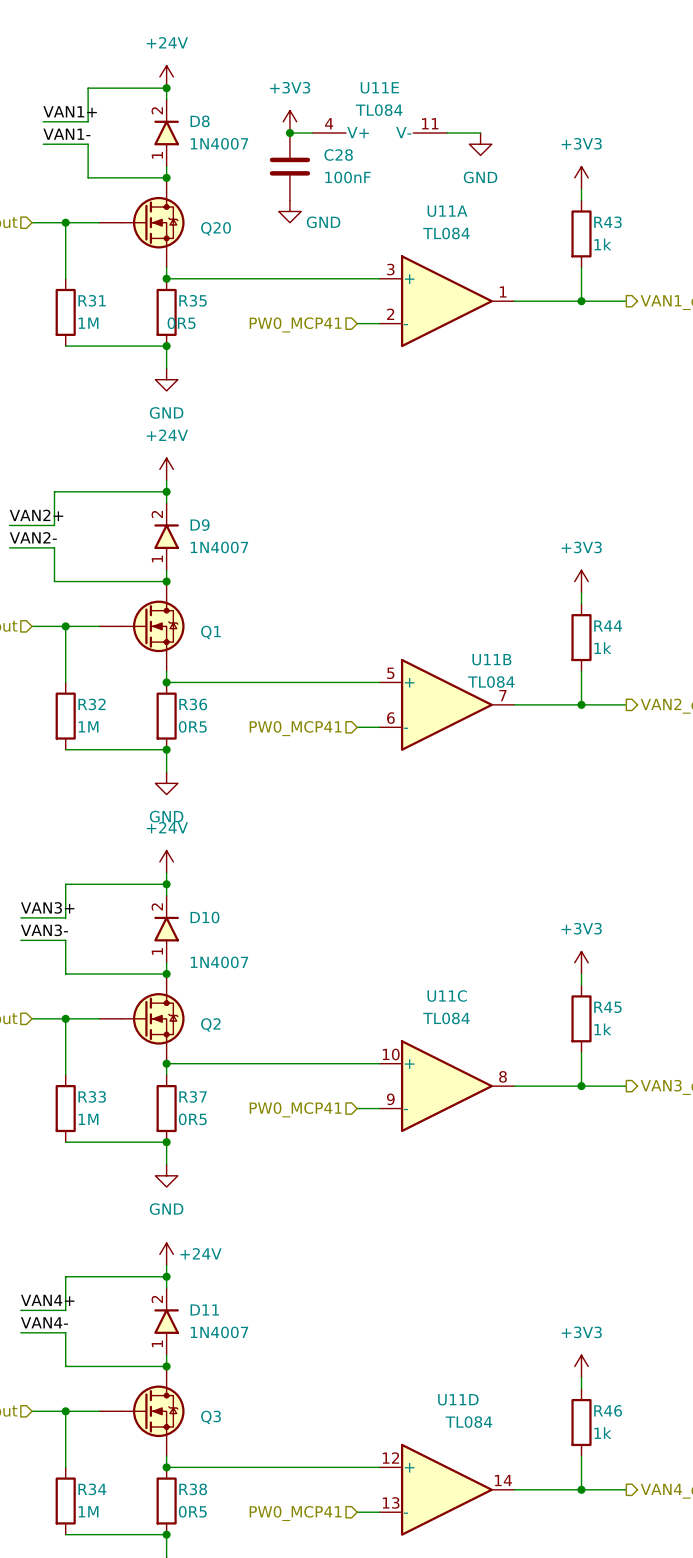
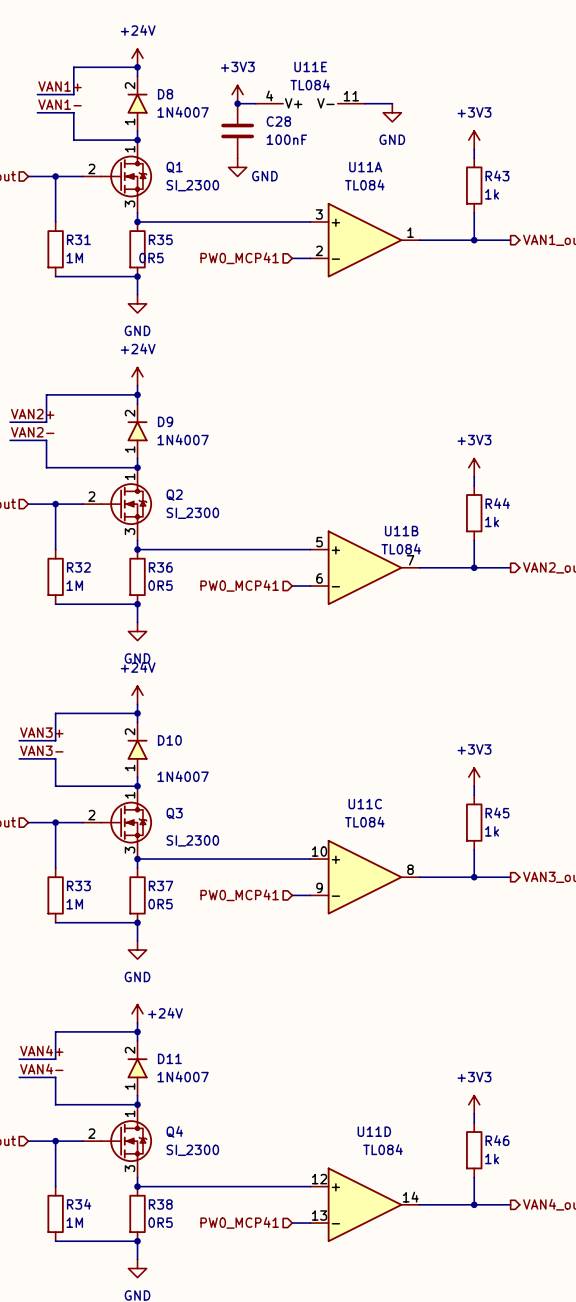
Q20: (141, 222) -> none
Q1 value: none -> SI_2300 (192, 185)
Q1 symbol: [99, 581, 185, 672] -> [82, 140, 153, 213]
Q2 value: none -> SI_2300 (192, 513)
Q2 symbol: [99, 973, 185, 1064] -> [82, 467, 153, 541]
Q3 value: none -> SI_2300 (192, 840)
Q3 symbol: [99, 1366, 185, 1457] -> [82, 786, 153, 860]
Q4: none -> SI_2300 (117, 1141)

